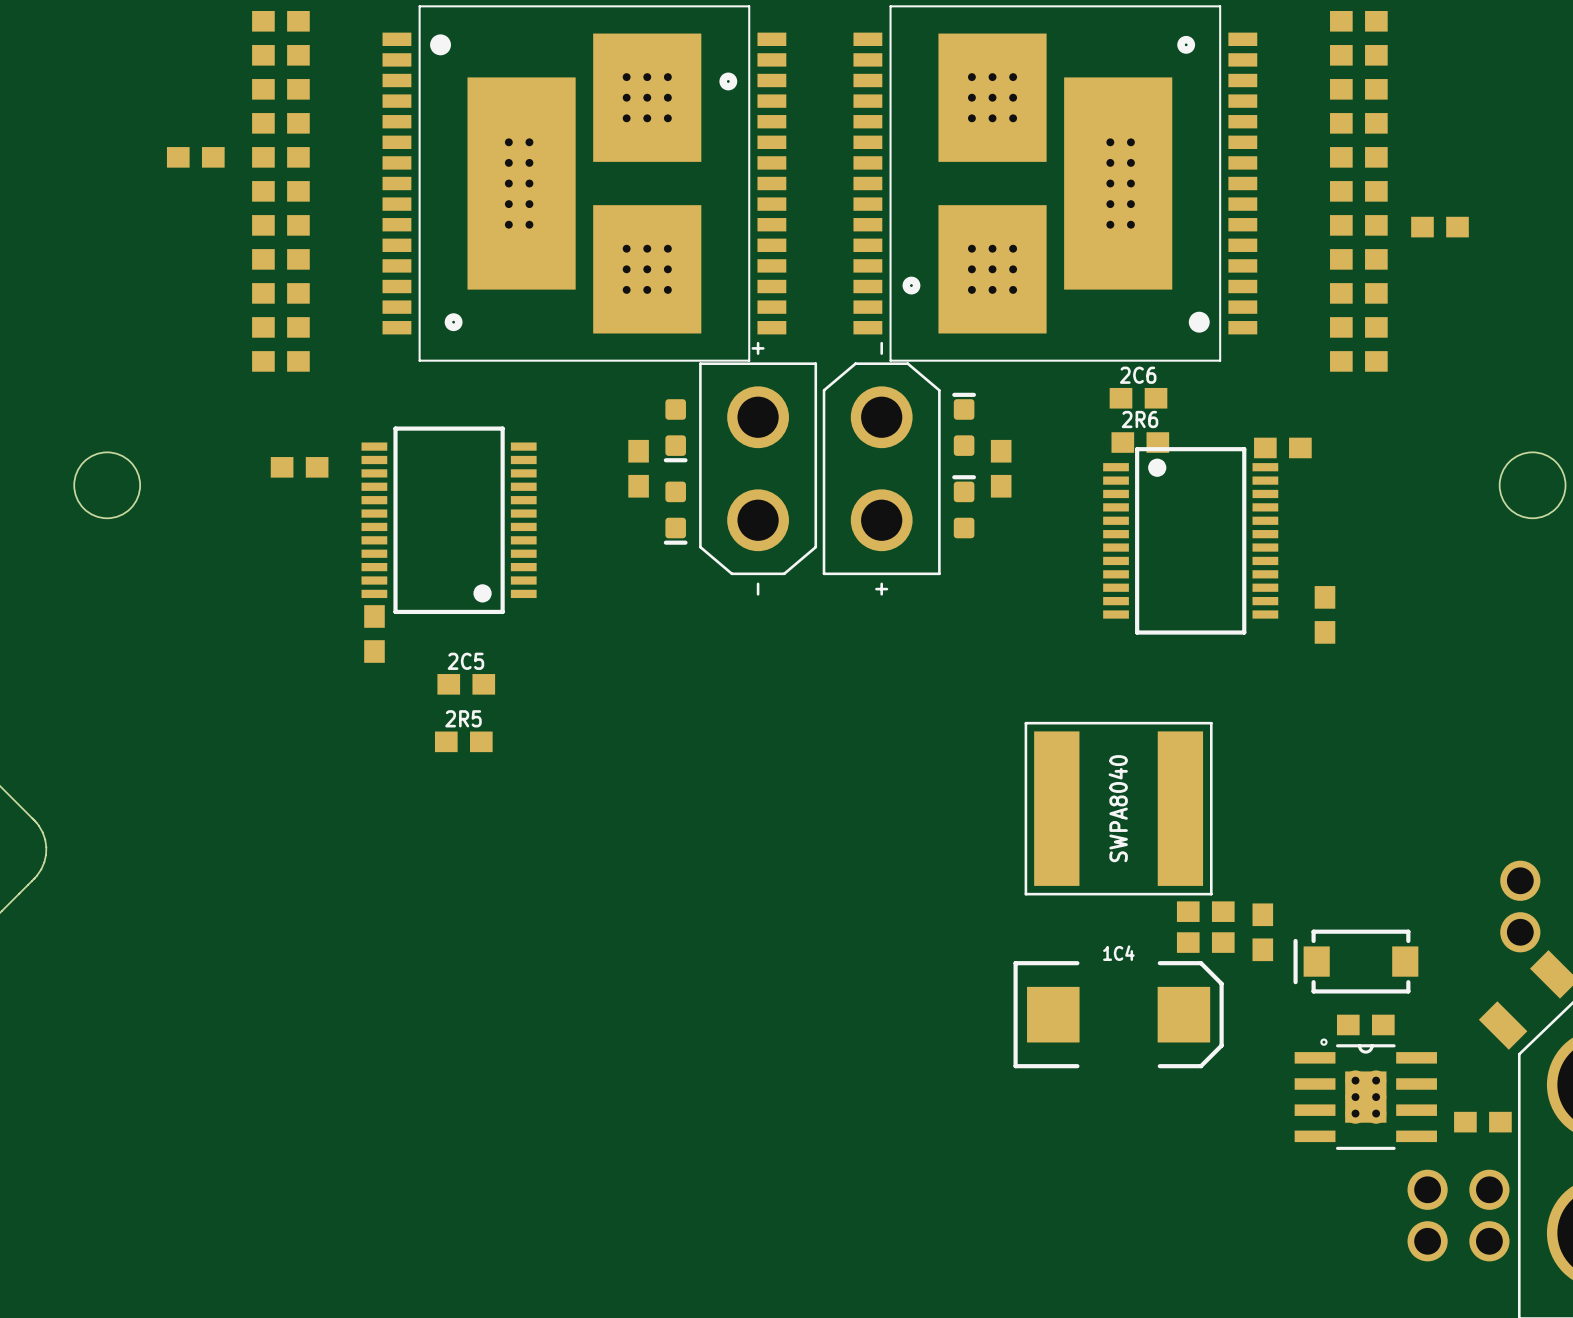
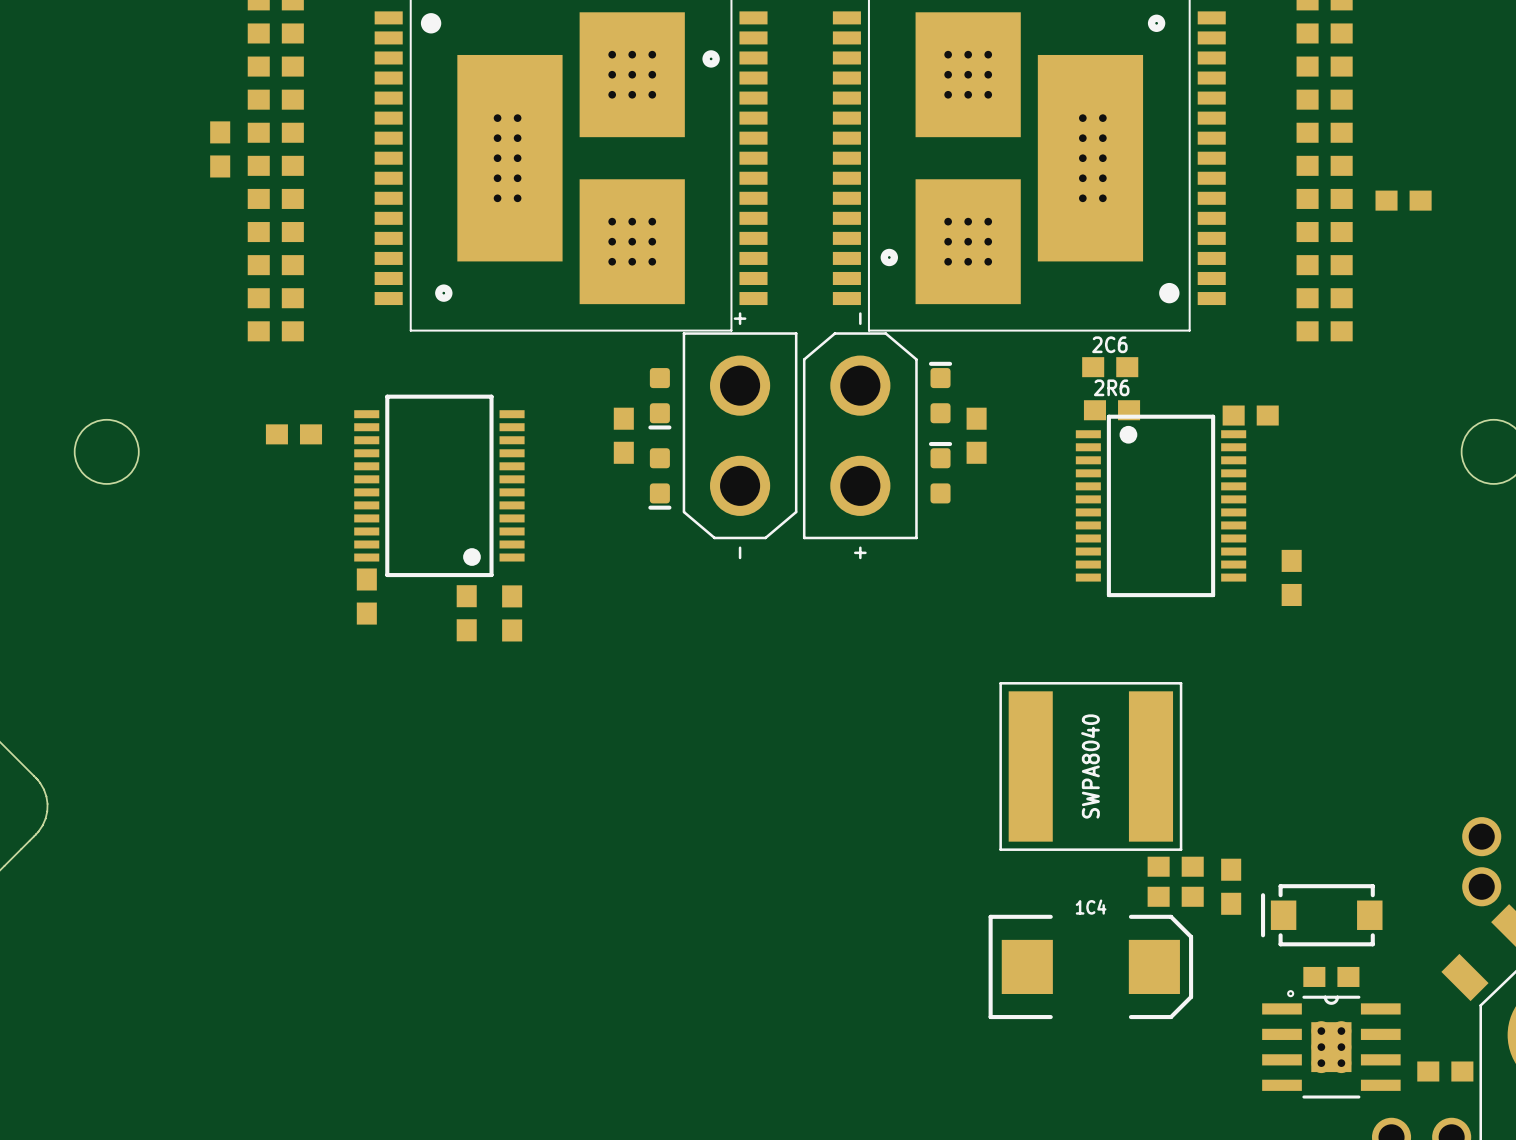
part rotation: 0° (195, 157) -> 90° clockwise (220, 149)
part: none -> (466, 613)
part: none -> (512, 613)
2C5: (466, 684) -> none
2R5: (463, 741) -> none

